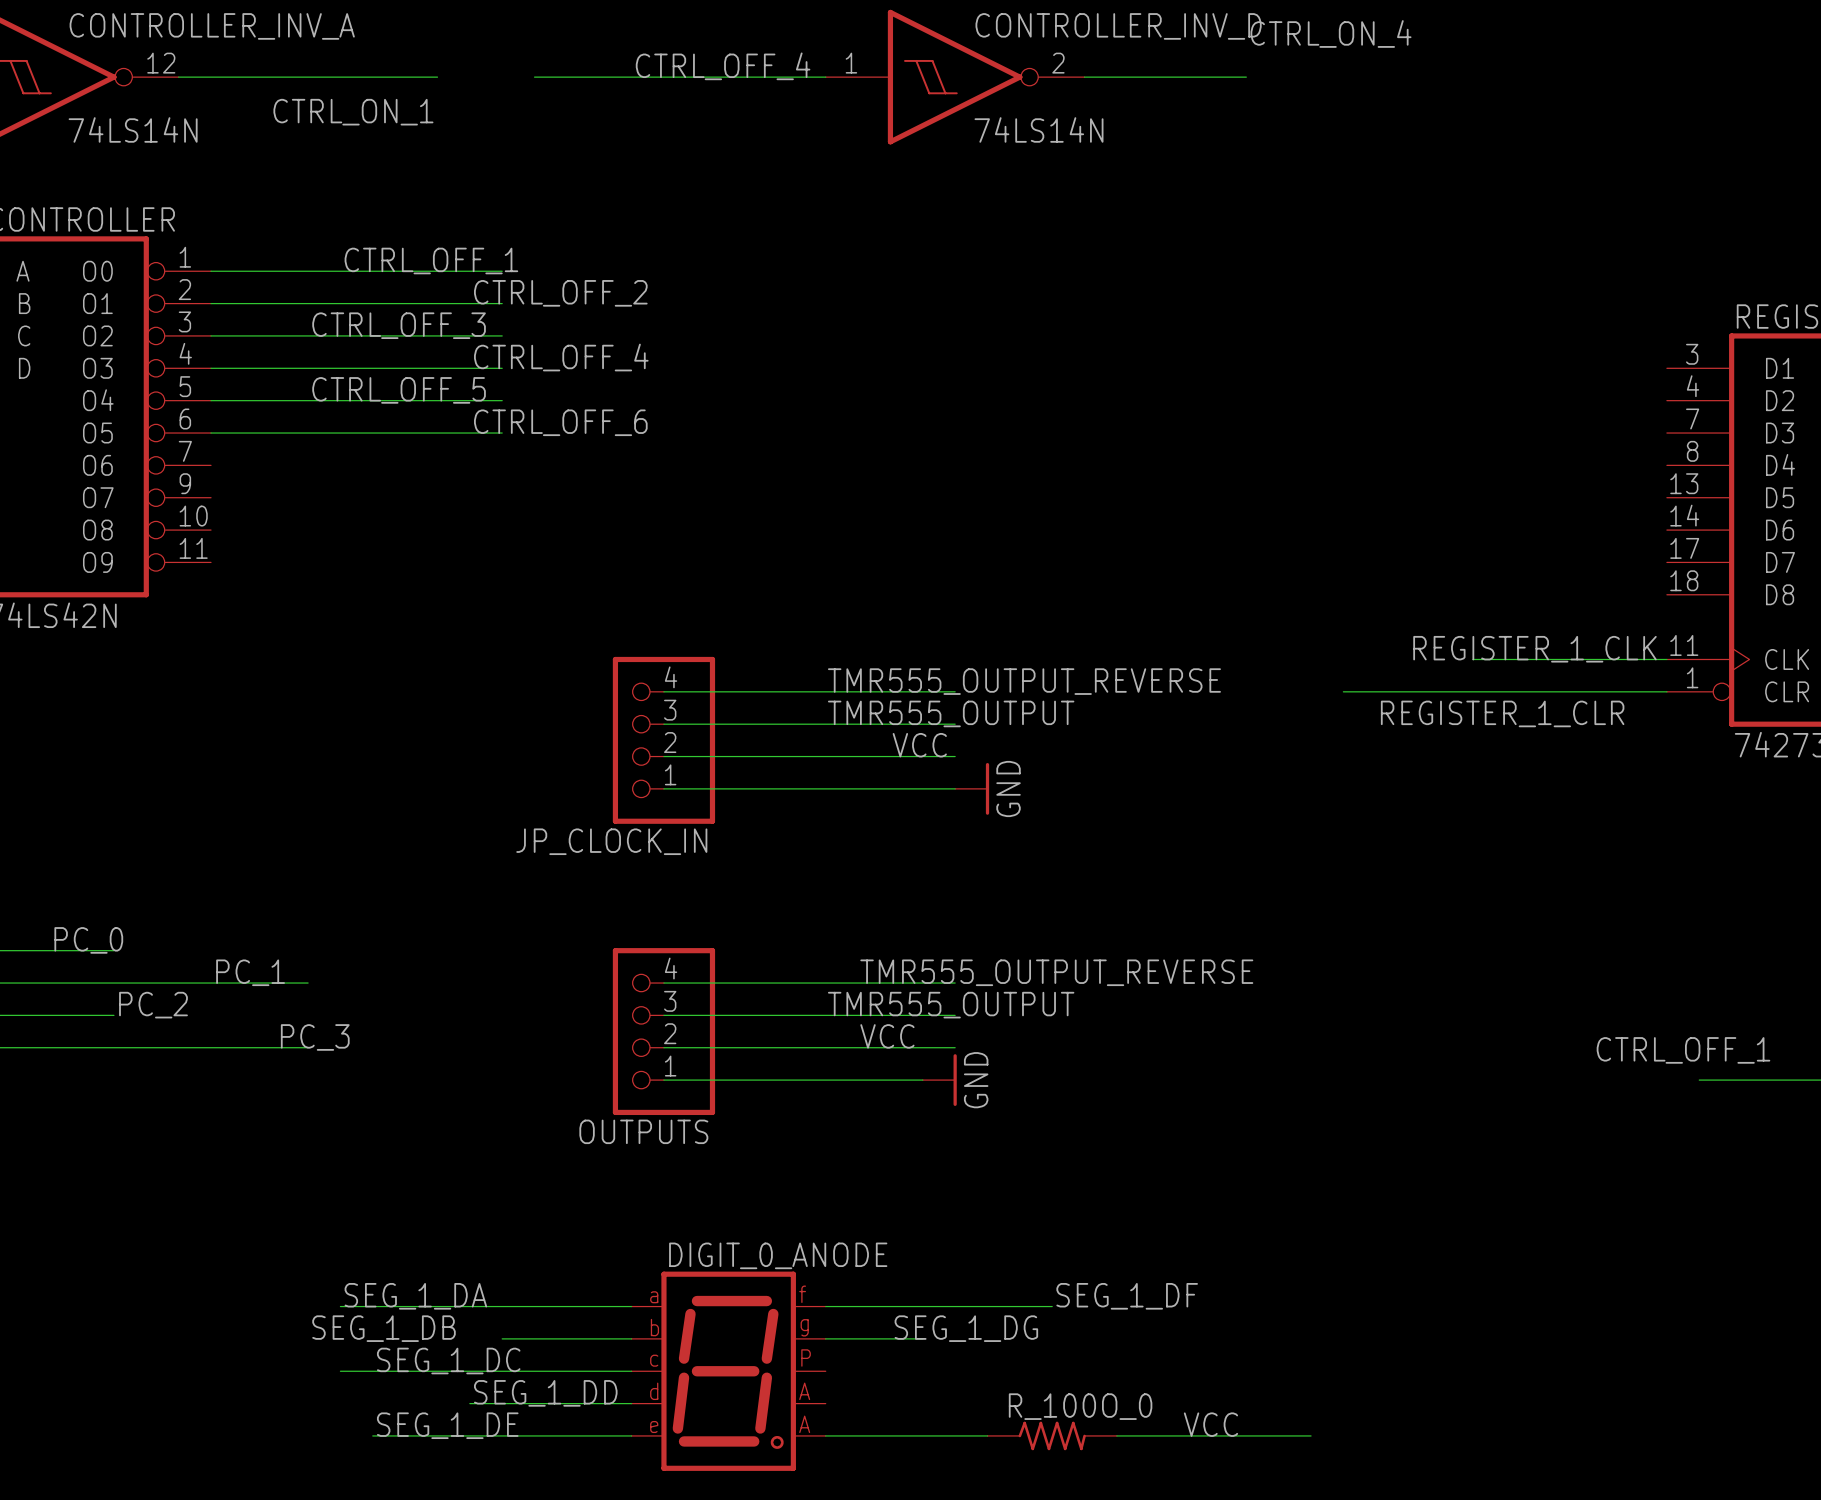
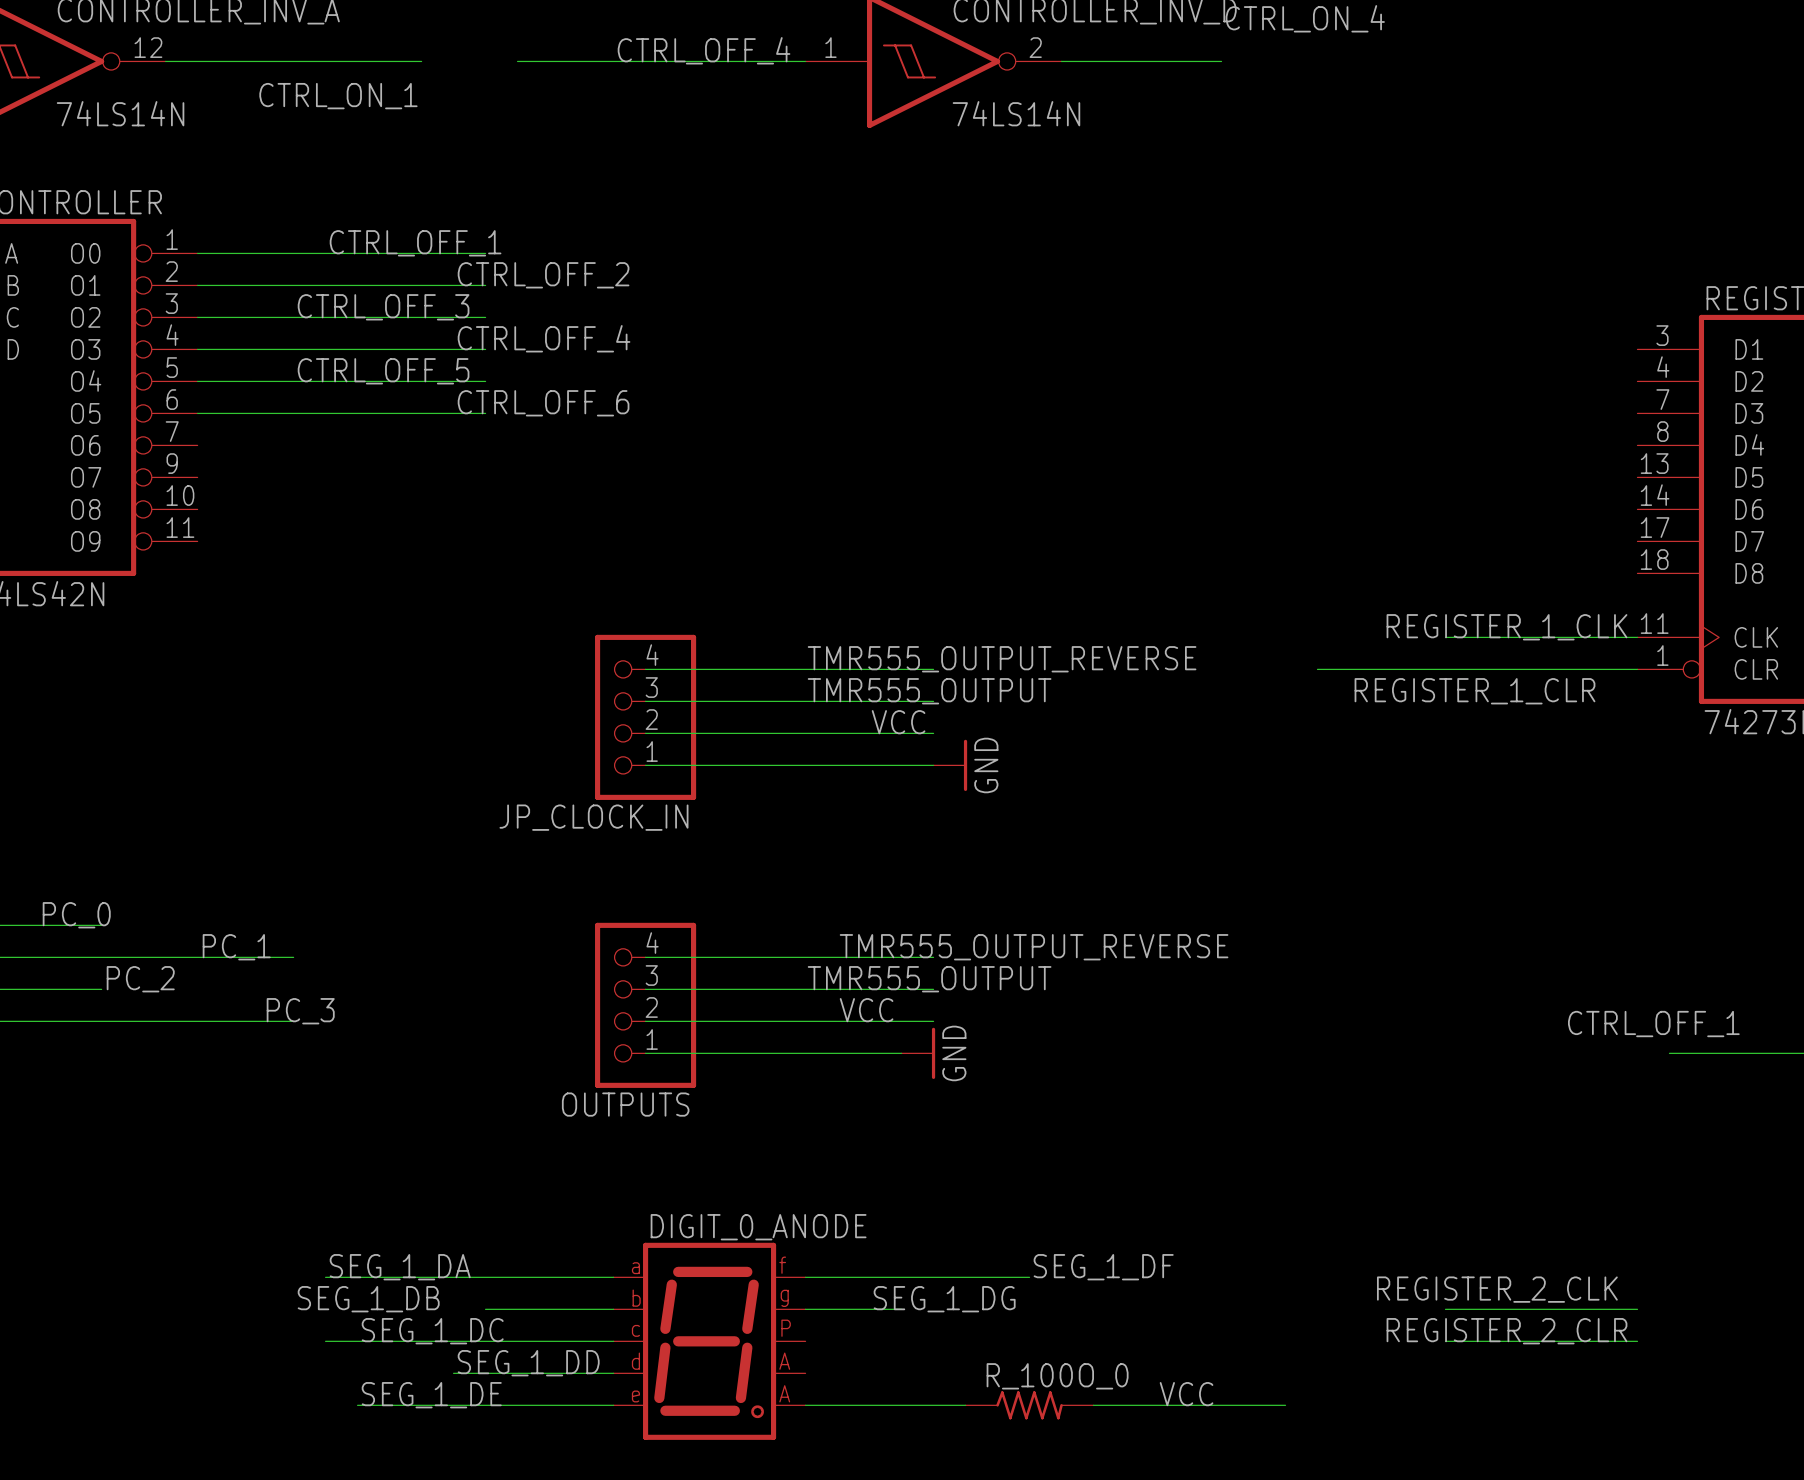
label: none -> REGISTER_2_CLK (1497, 1289)
wire: none -> (1445, 1309) (1637, 1309)
label: none -> REGISTER_2_CLR (1506, 1331)
wire: none -> (1445, 1341) (1637, 1341)

